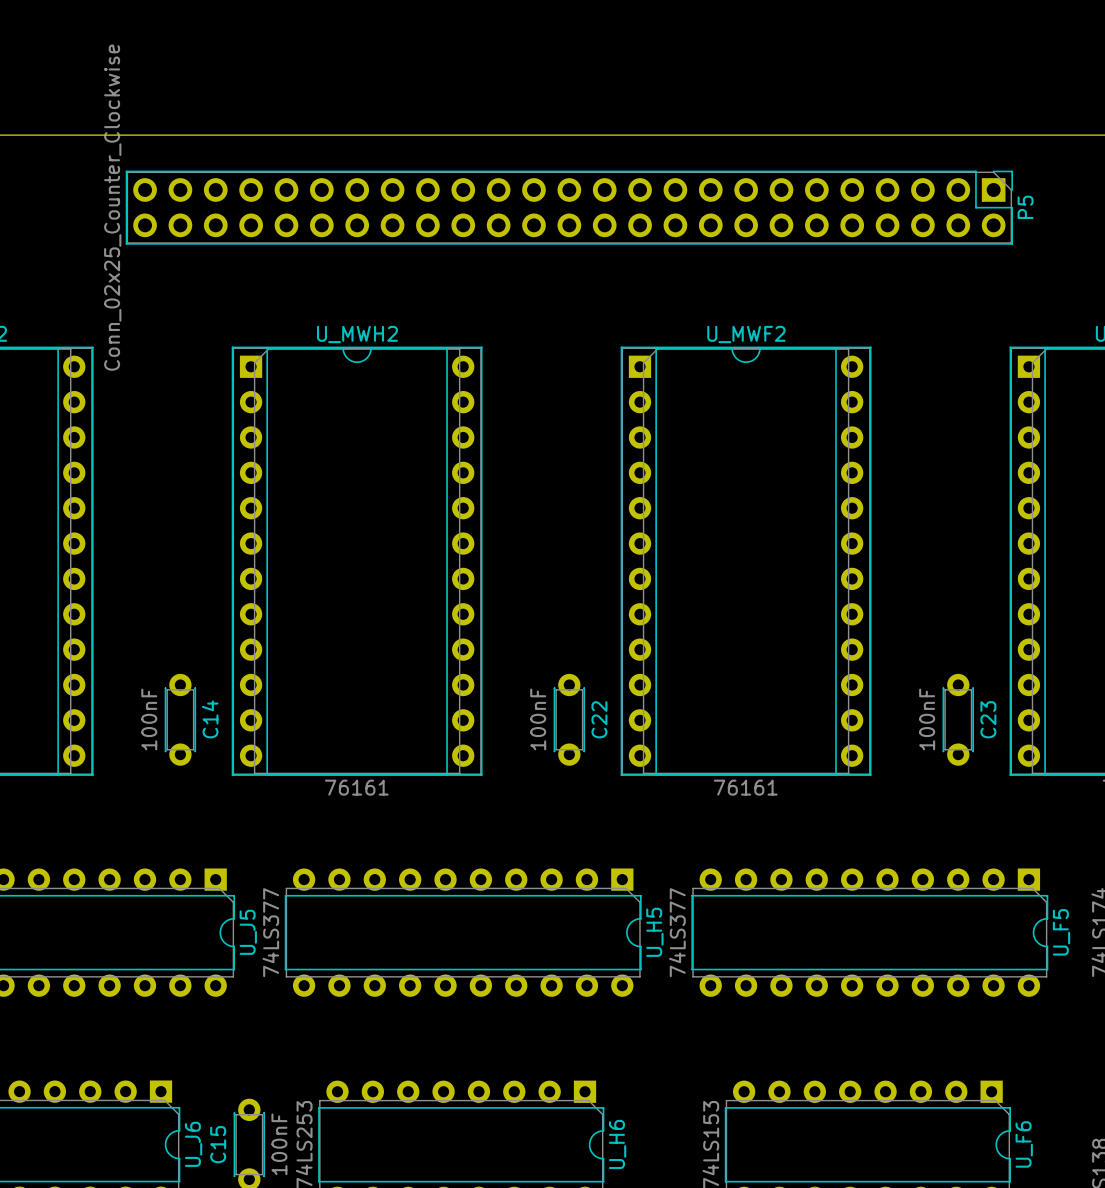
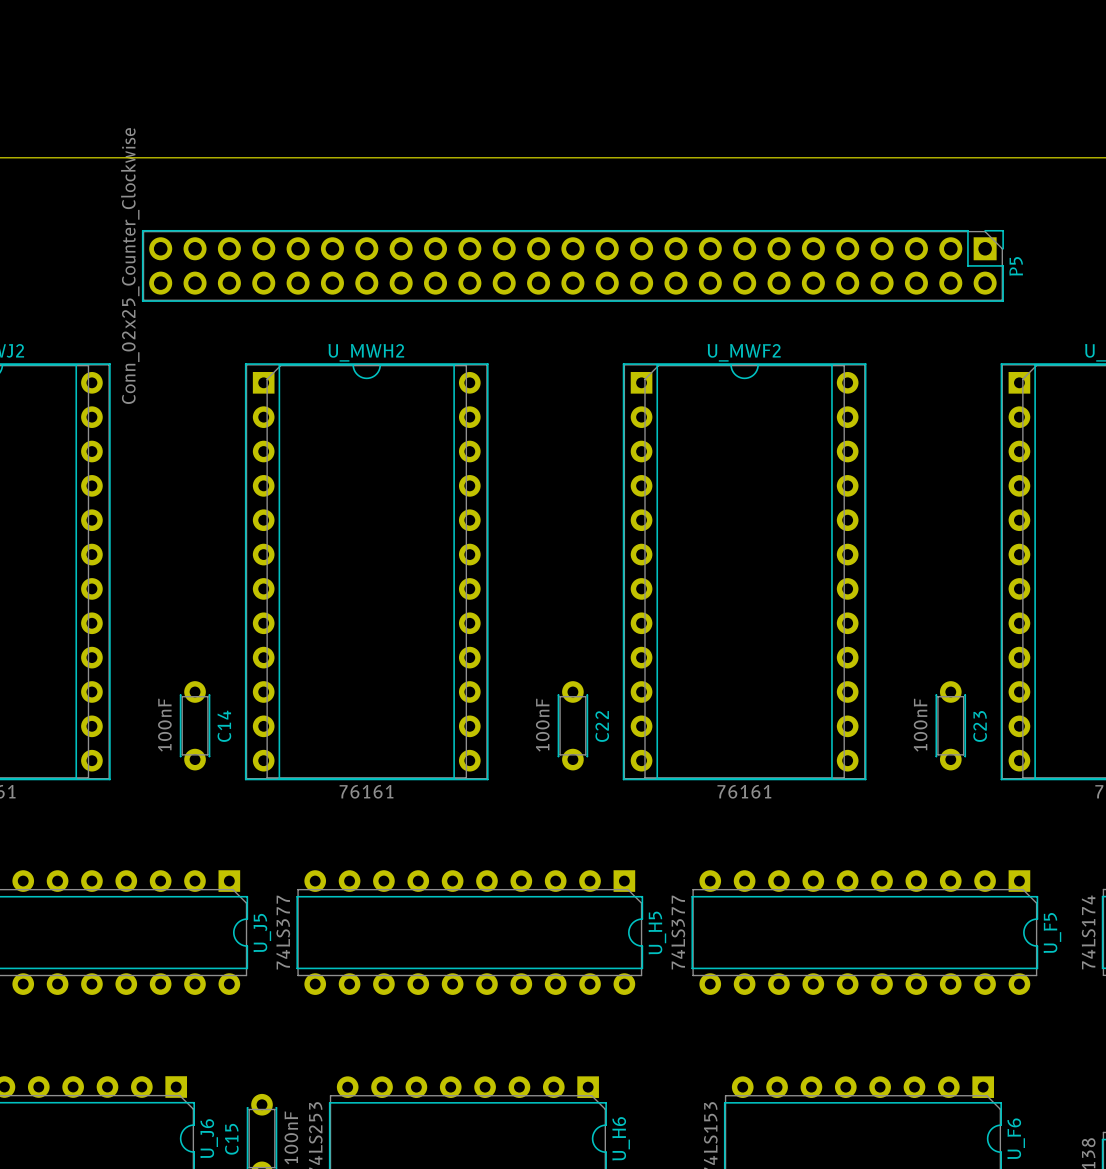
P5 position: (569, 207) -> (572, 265)

